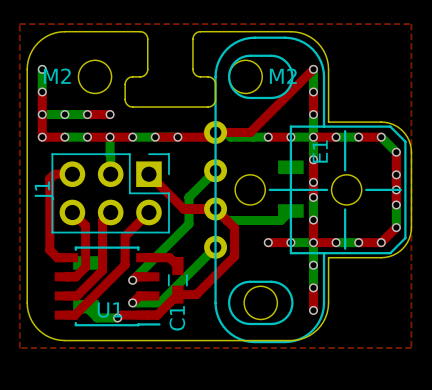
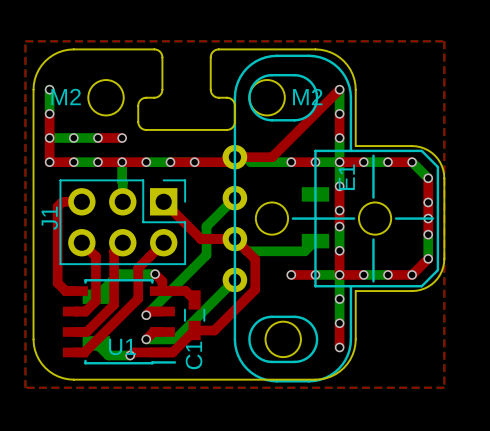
bottom track: none -> (155, 274) (118, 274) (96, 296)
top track: none -> (155, 274) (162, 281) (162, 291)
via: none -> (155, 274)

